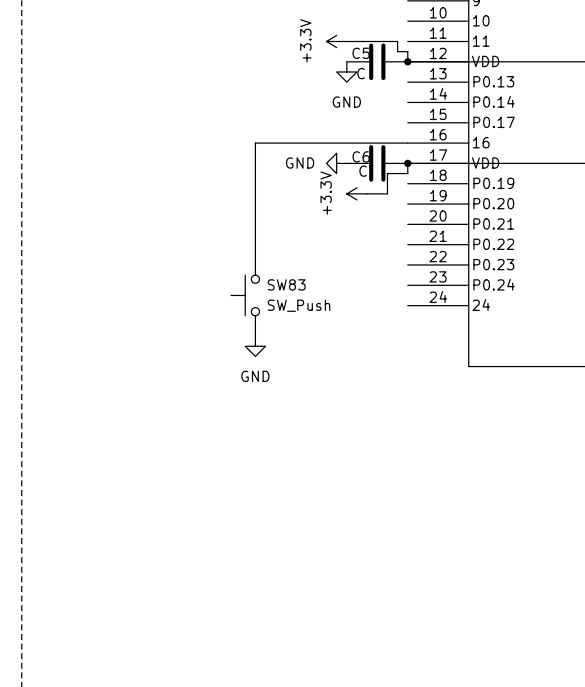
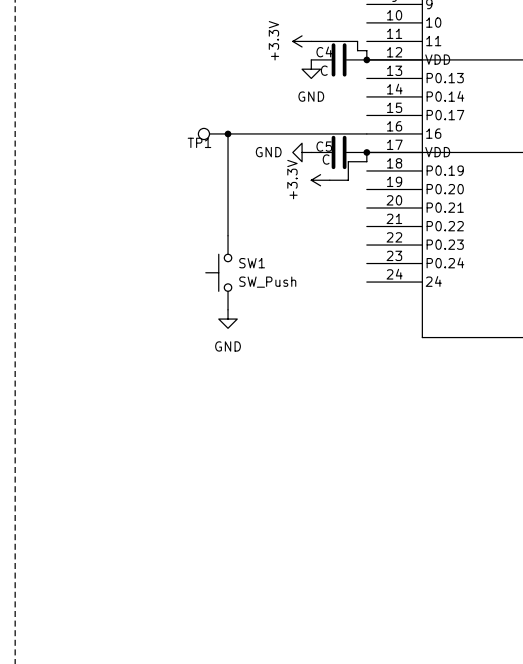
C5 name: C5 (361, 53) -> C4 (324, 51)
TP1: none -> (213, 133)
junction: none -> (228, 133)
C6 name: C6 (361, 156) -> C5 (324, 146)
SW83 name: SW83 (286, 284) -> SW1 (252, 263)

